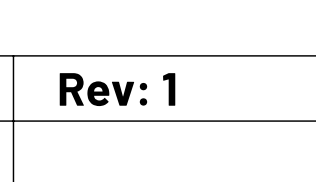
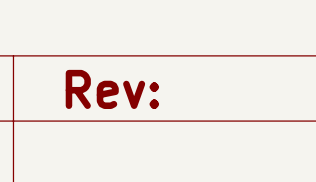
title block: Rev: 1 (117, 89) -> Rev: (112, 89)

